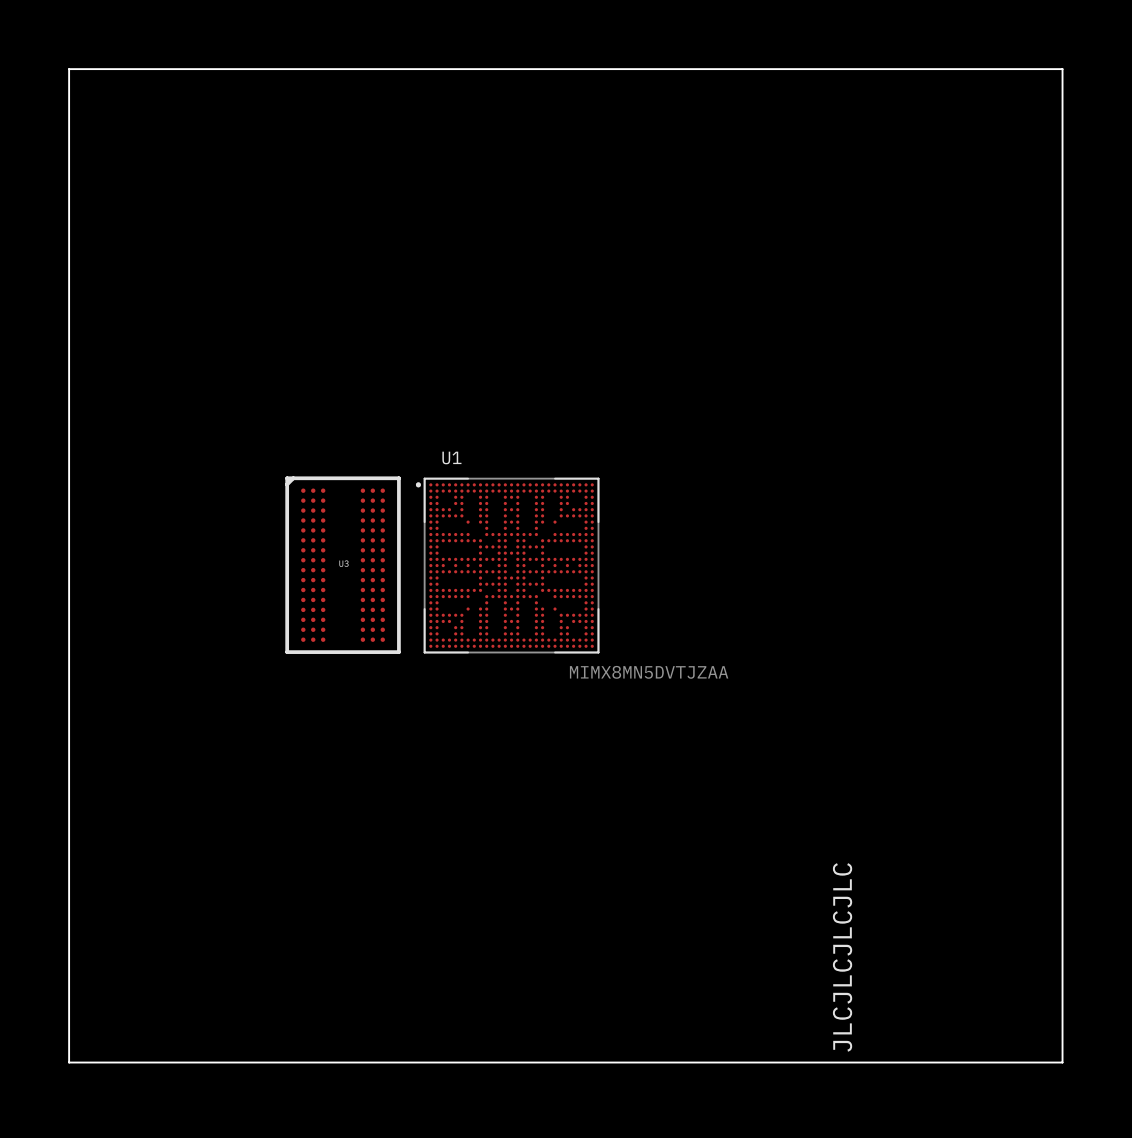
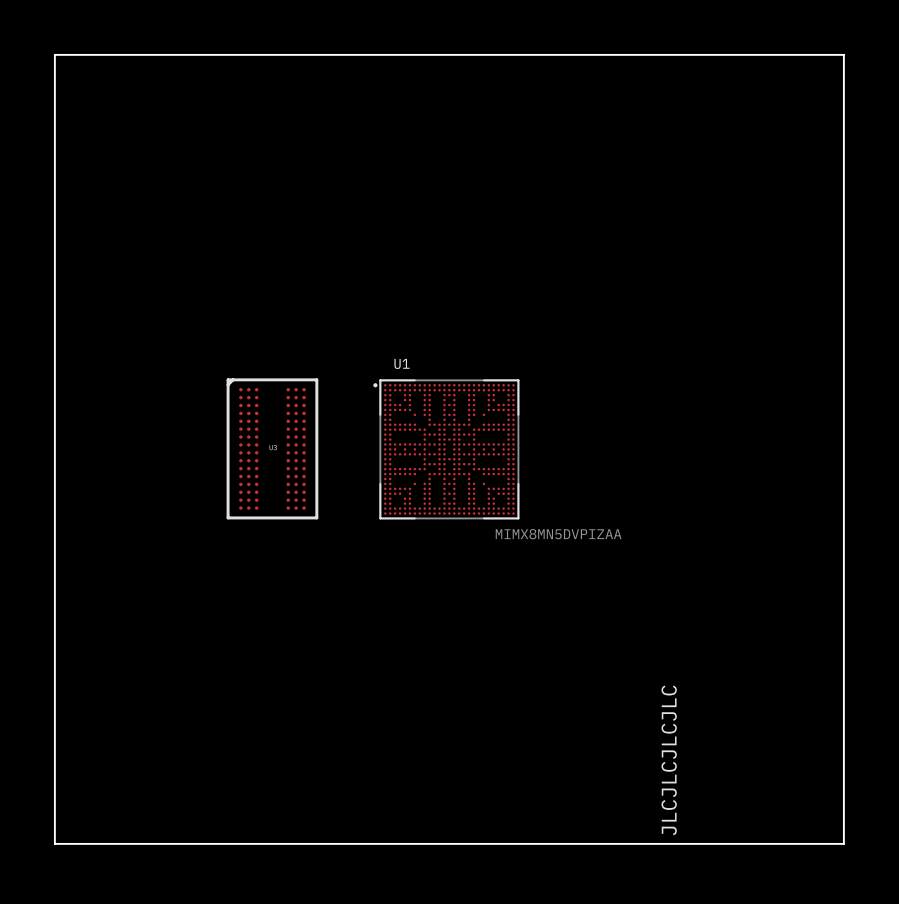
U1 position: (507, 565) -> (446, 449)
U1 value: MIMX8MN5DVTJZAA (649, 672) -> MIMX8MN5DVPIZAA (558, 534)

